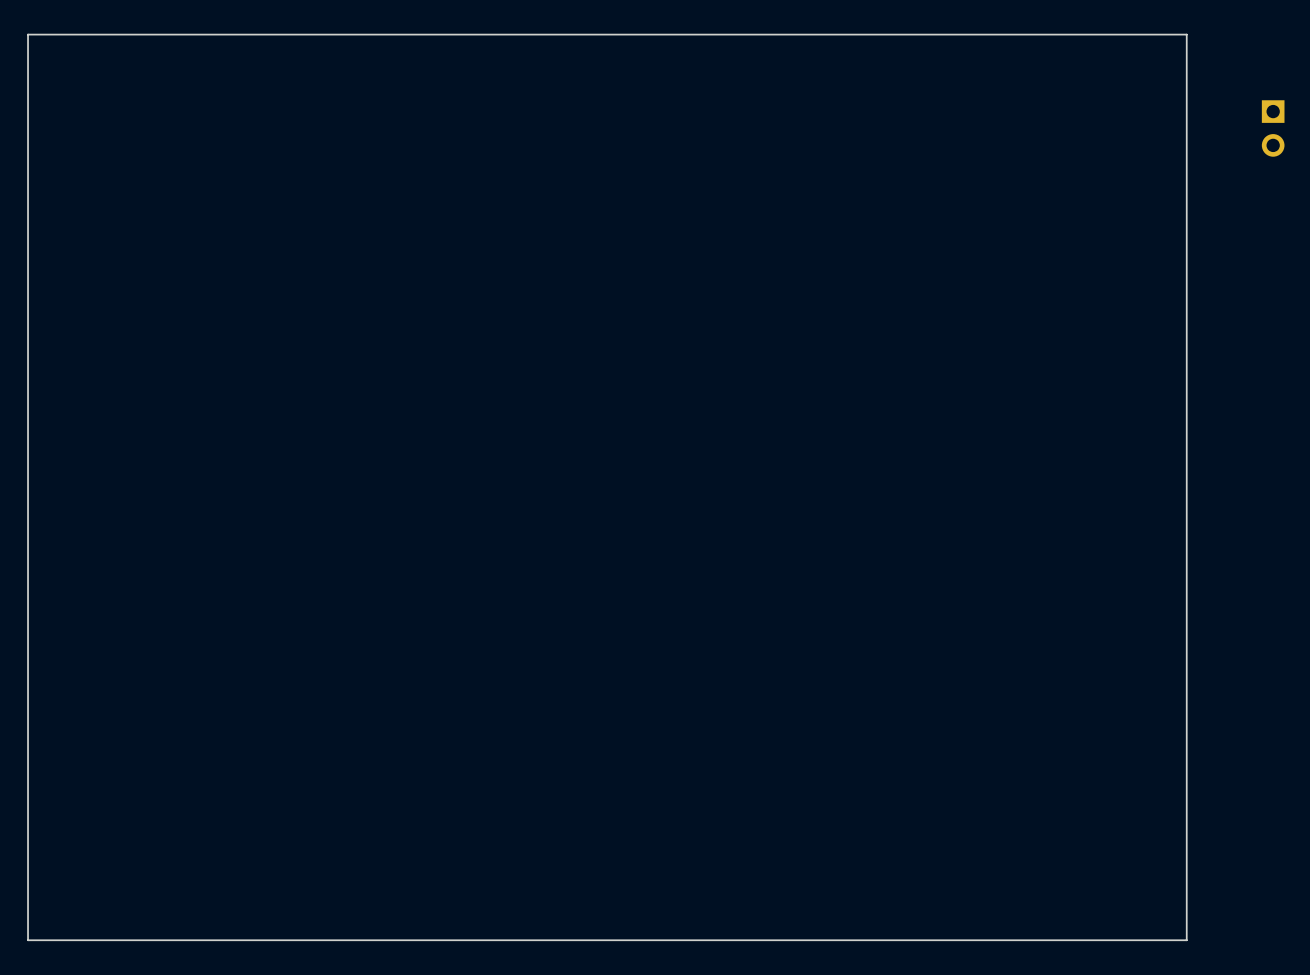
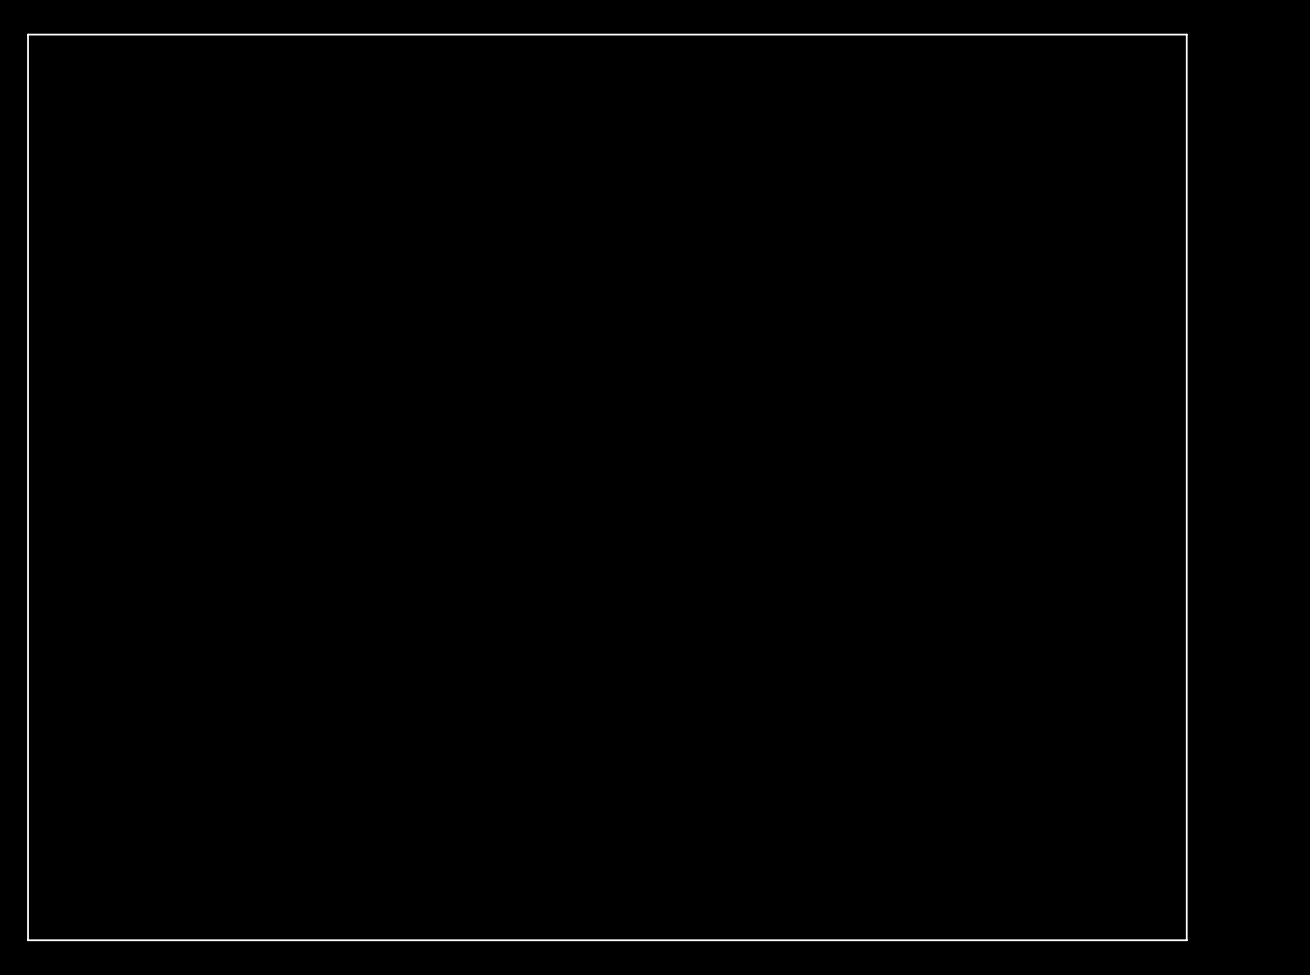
part: (1273, 128) -> none

